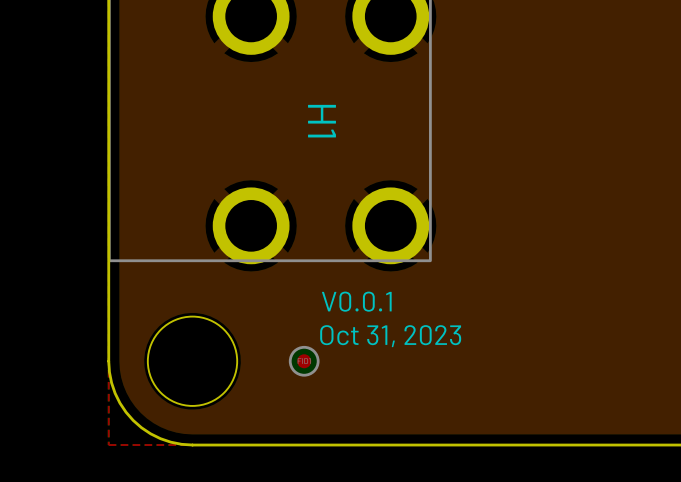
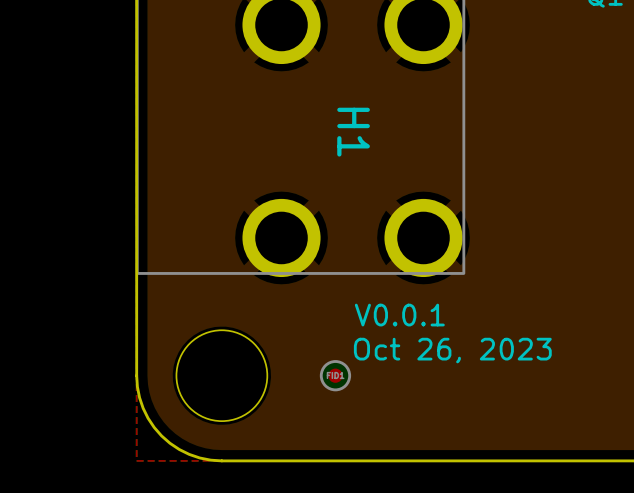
text: Oct 31, 2023 (390, 336) -> Oct 26, 2023 (452, 350)

